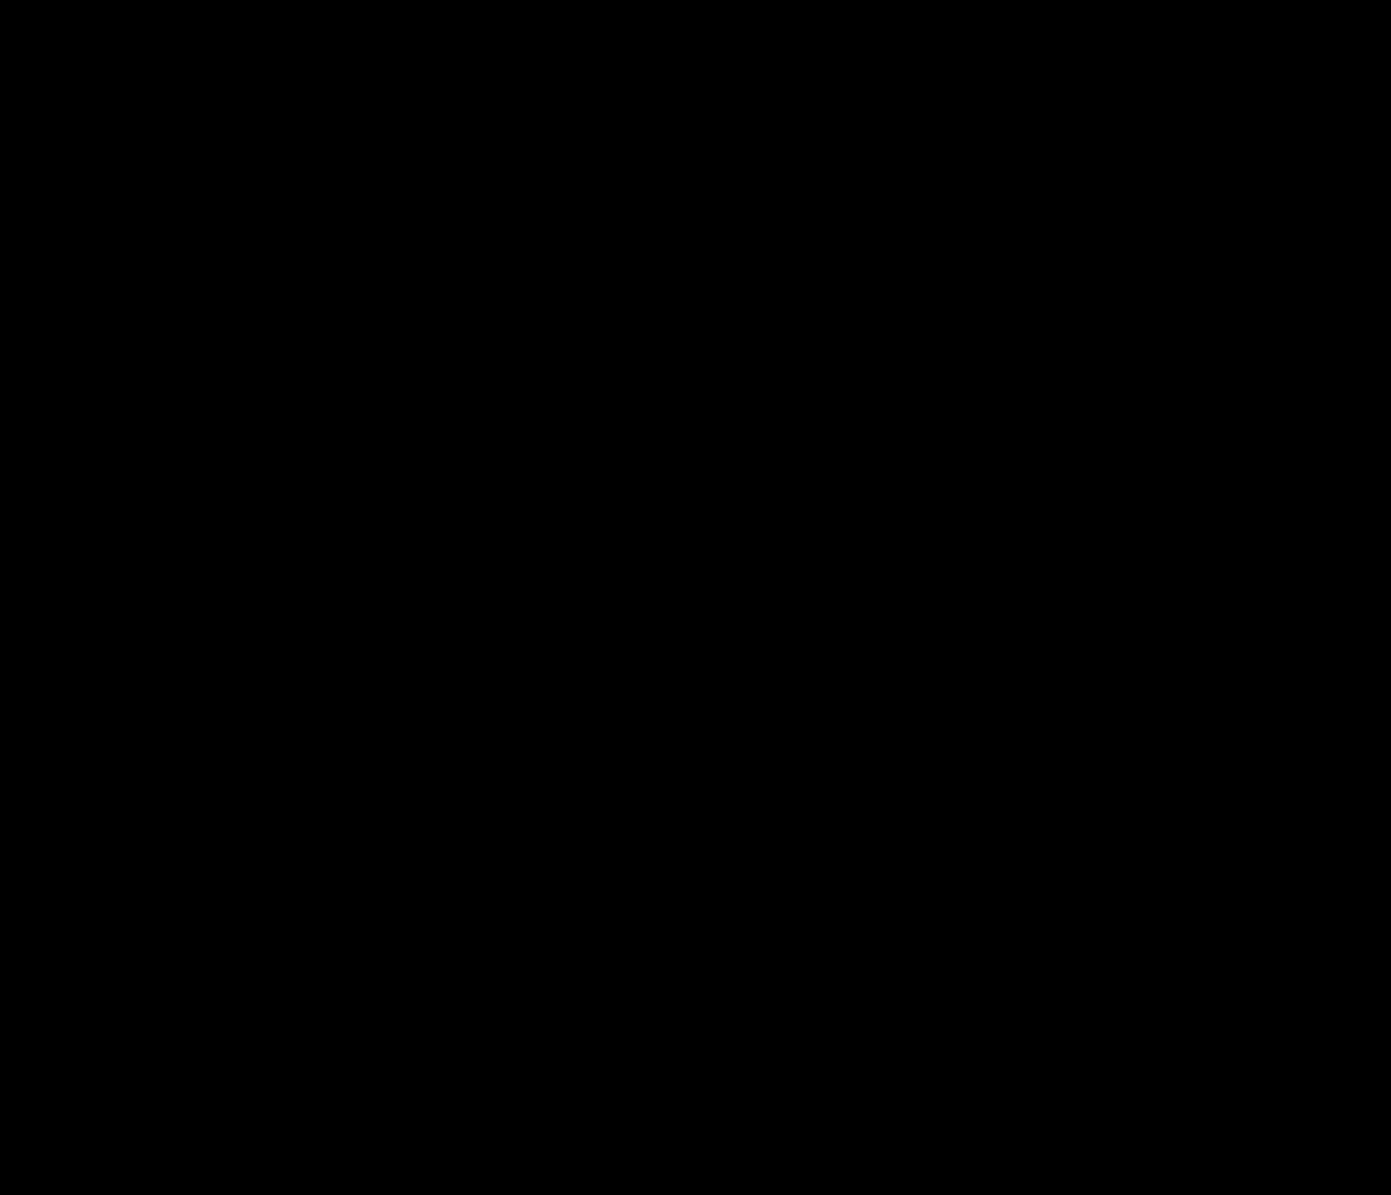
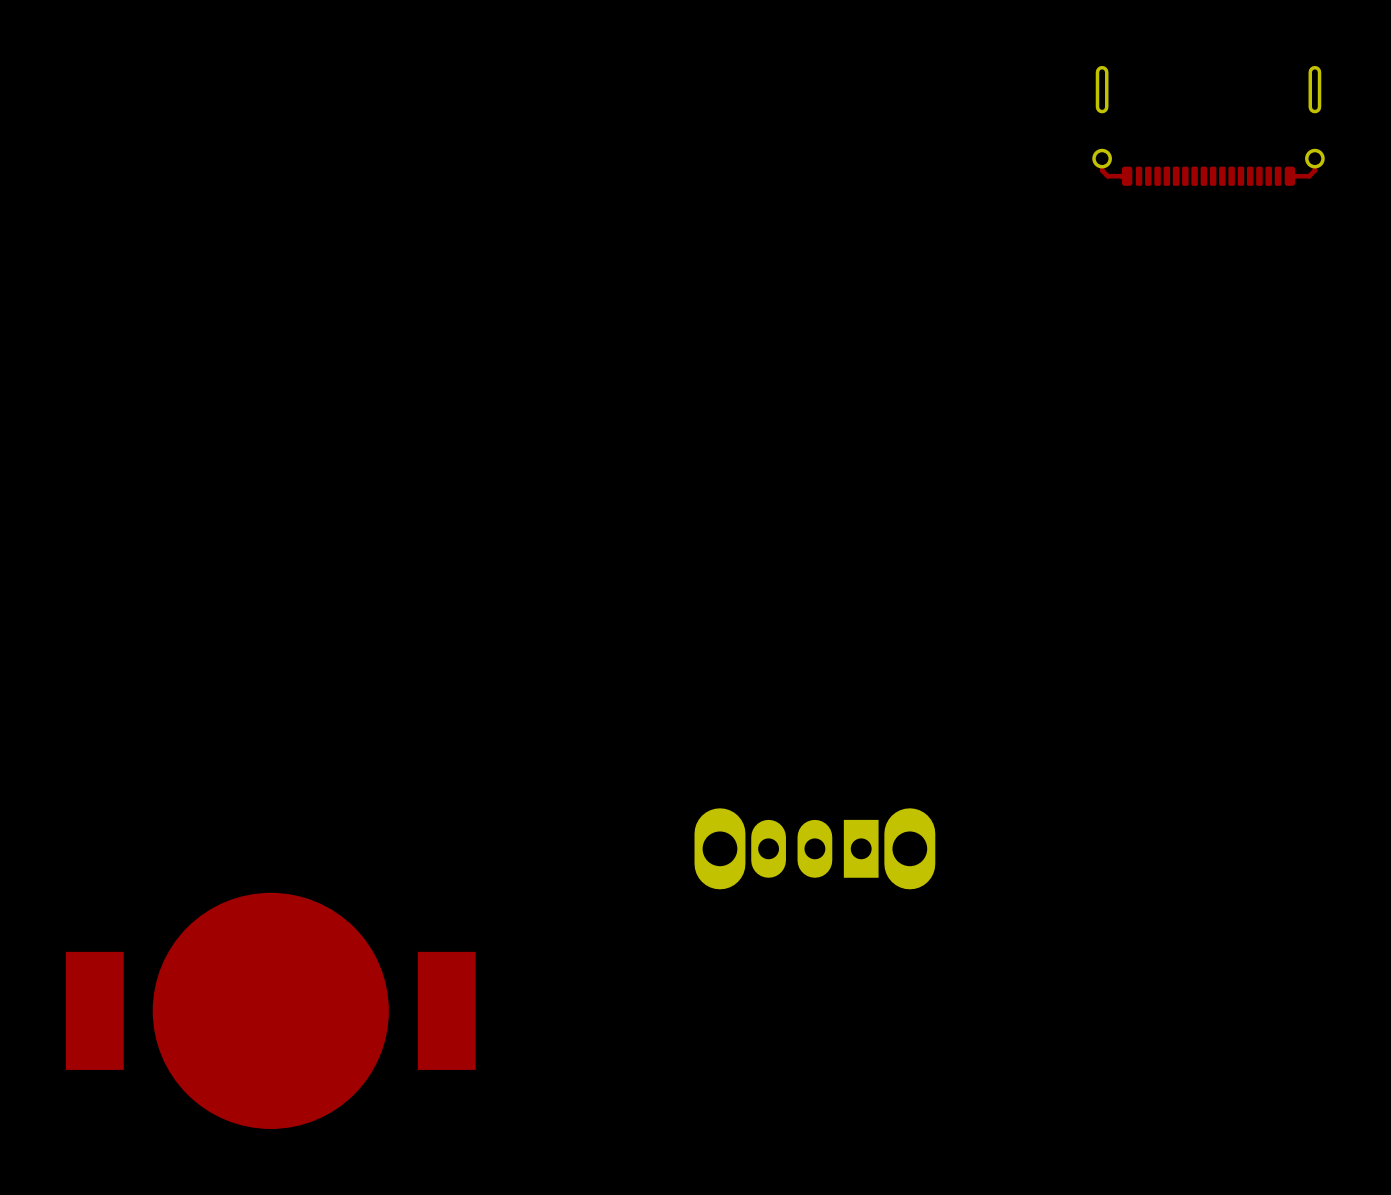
part: none -> (1208, 125)
top track: none -> (1102, 158) (1102, 170) (1107, 176) (1127, 176)
top track: none -> (1314, 158) (1314, 170) (1309, 176) (1289, 176)
part: none -> (814, 848)
part: none -> (270, 1010)

